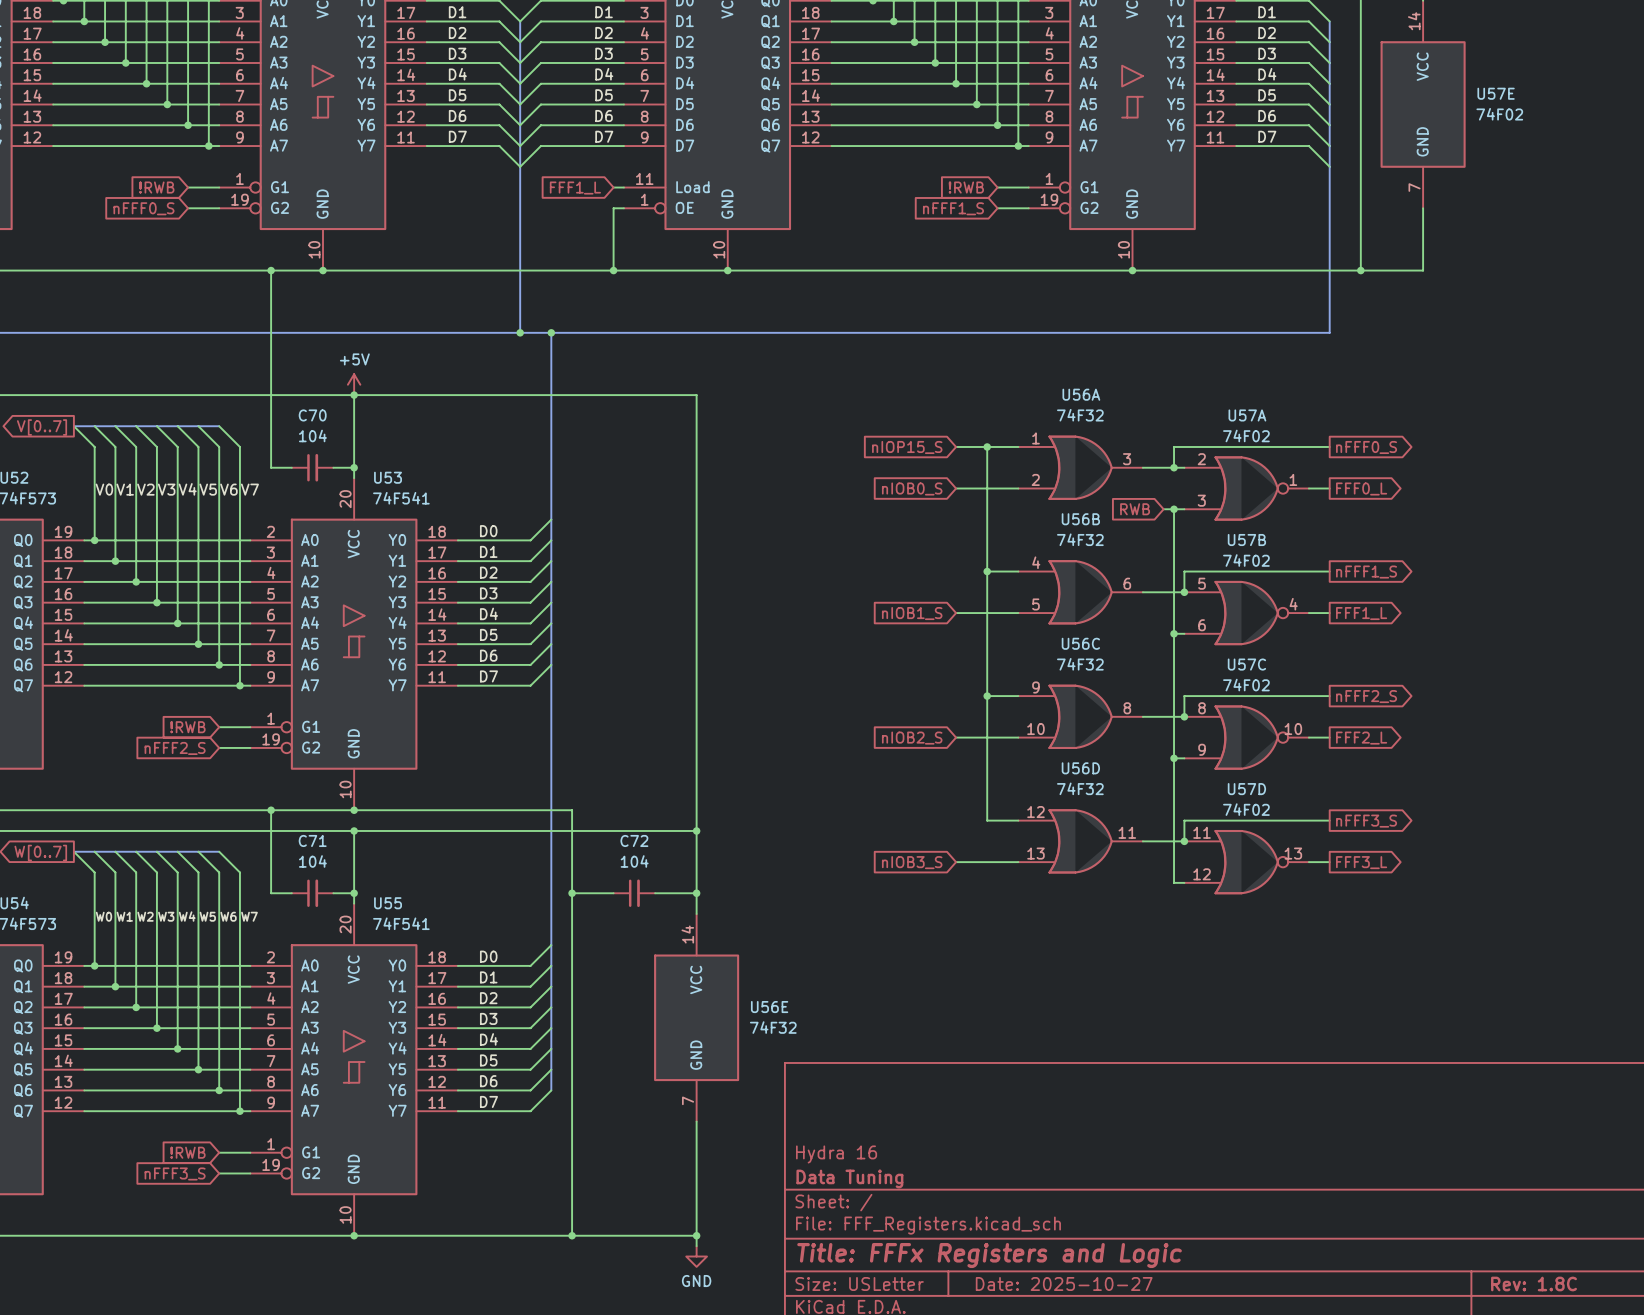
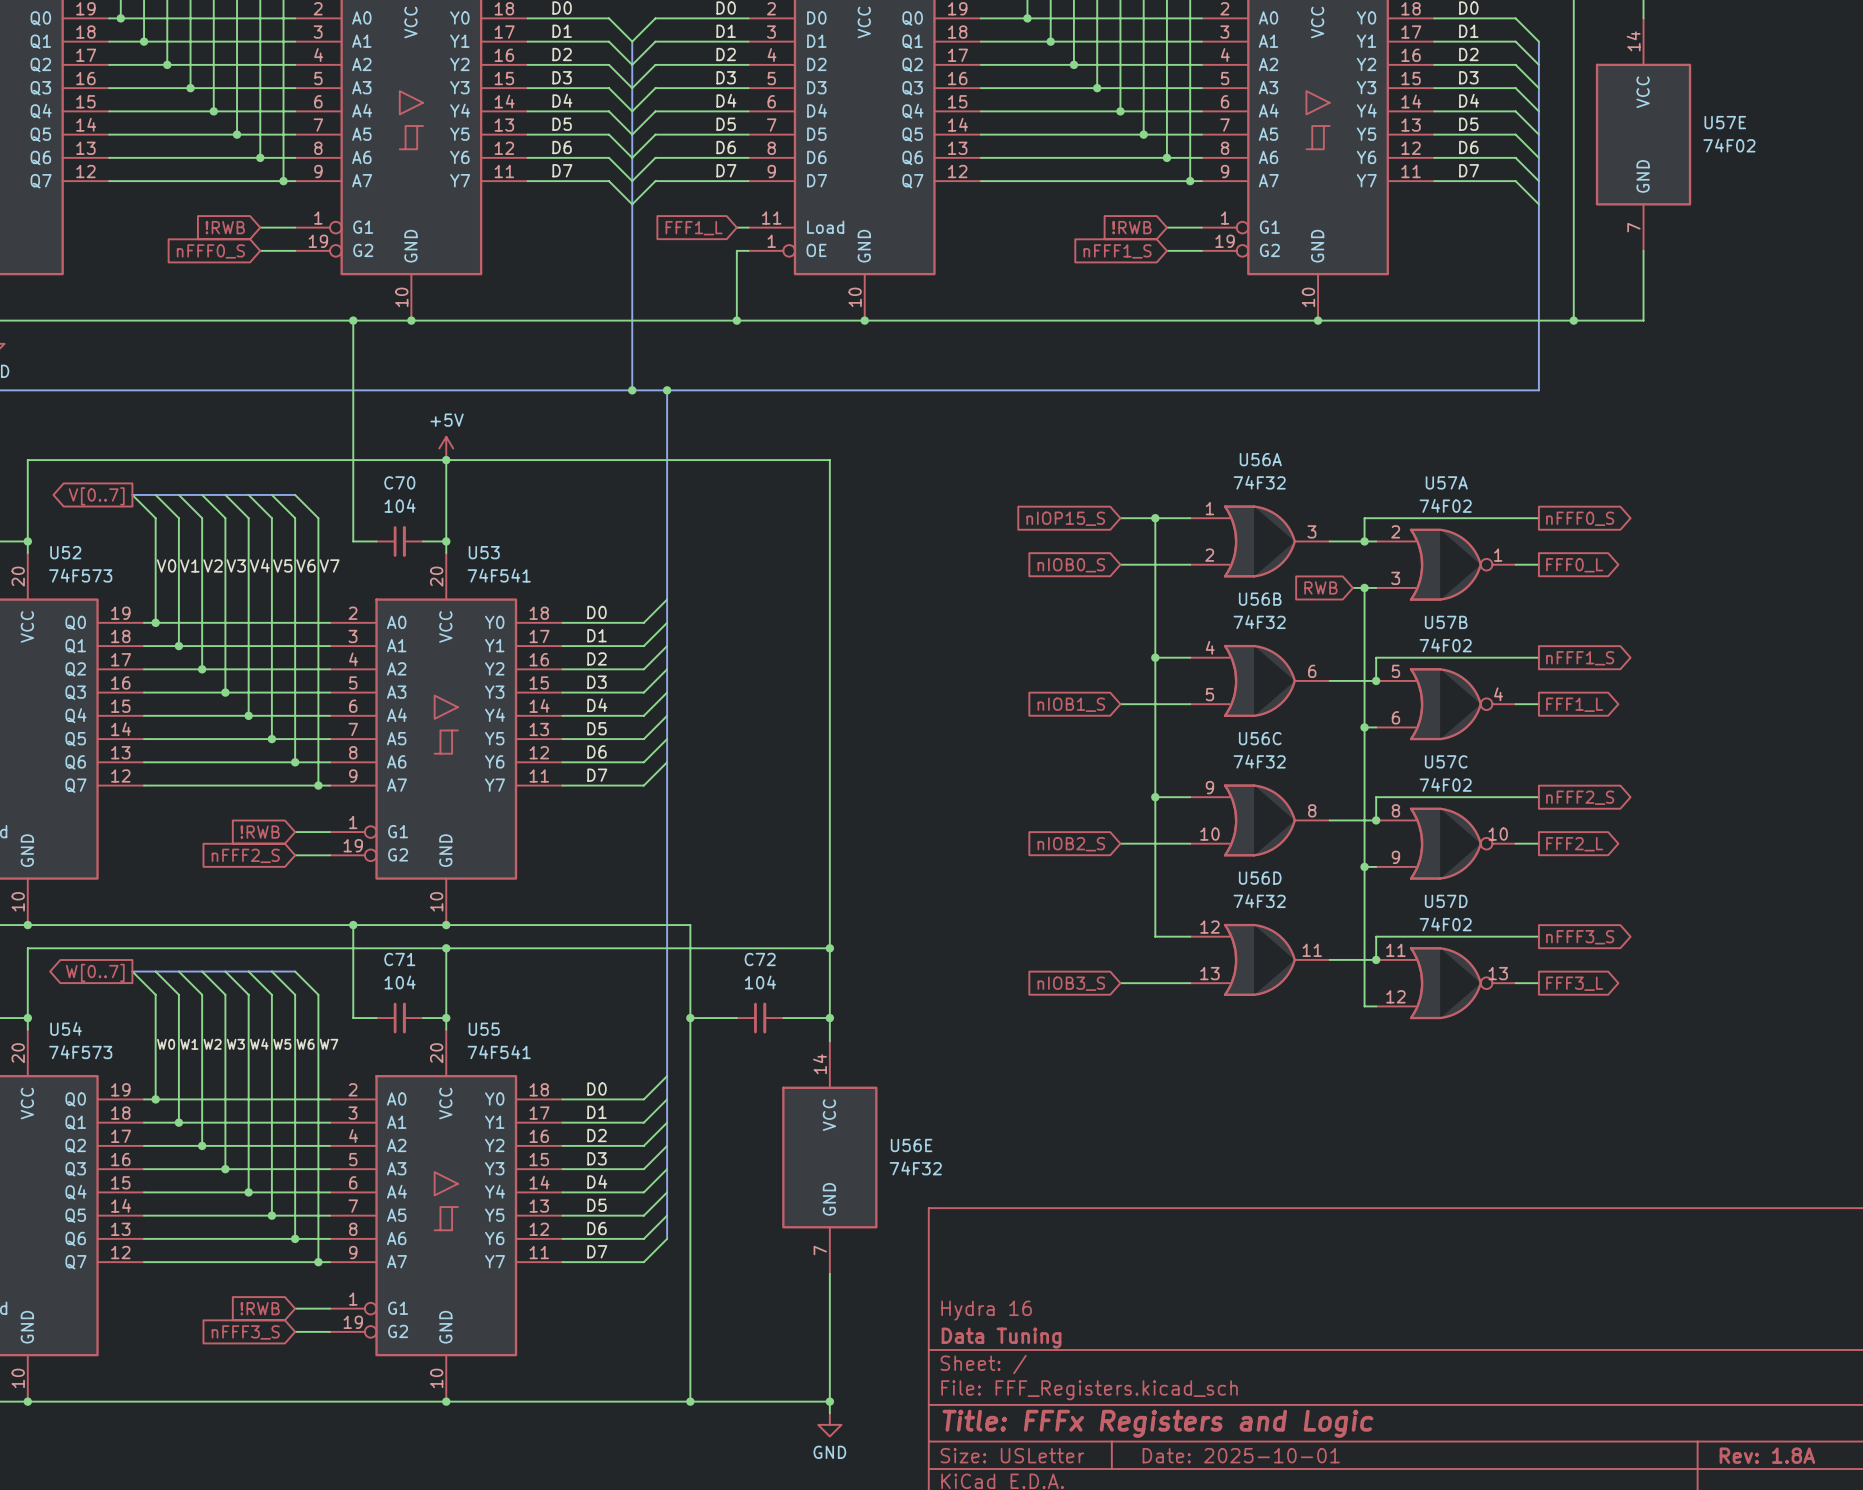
title block: Date: 2025-10-27 (1064, 1283) -> Date: 2025-10-01 (1241, 1455)
title block: Rev: 1.8C (1534, 1283) -> Rev: 1.8A (1767, 1455)

